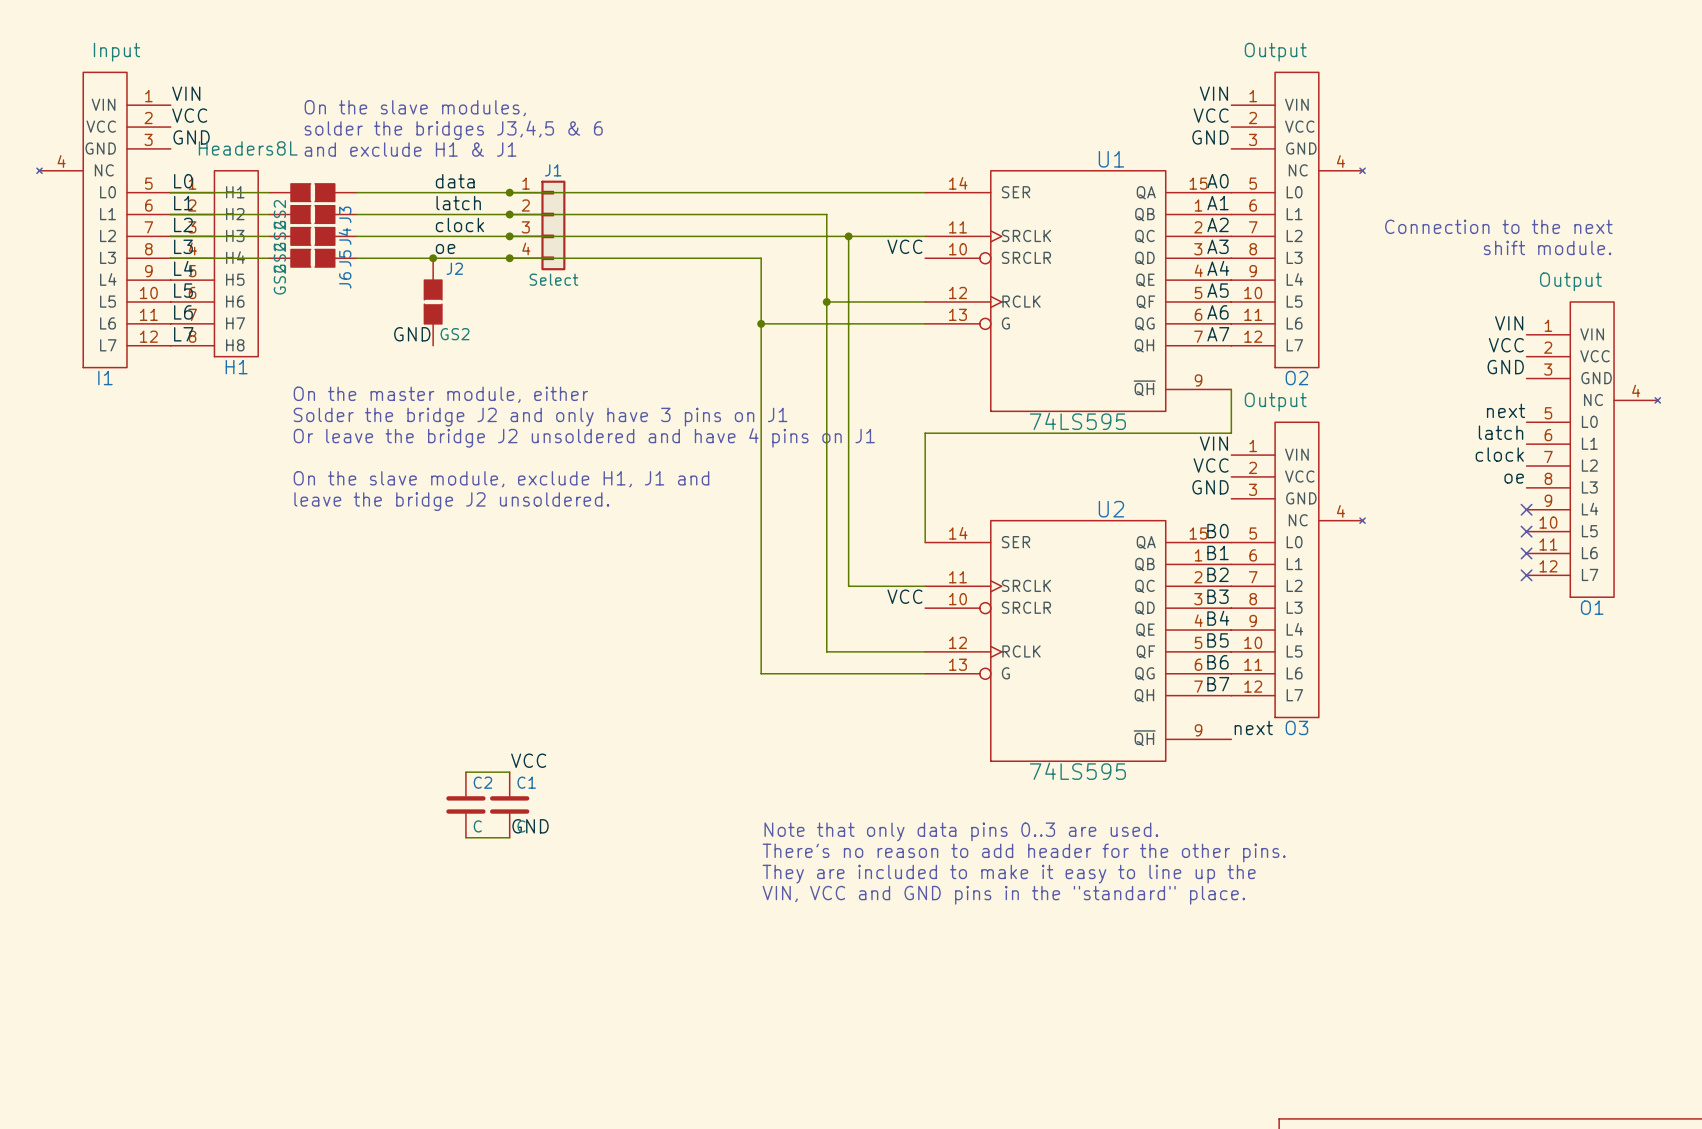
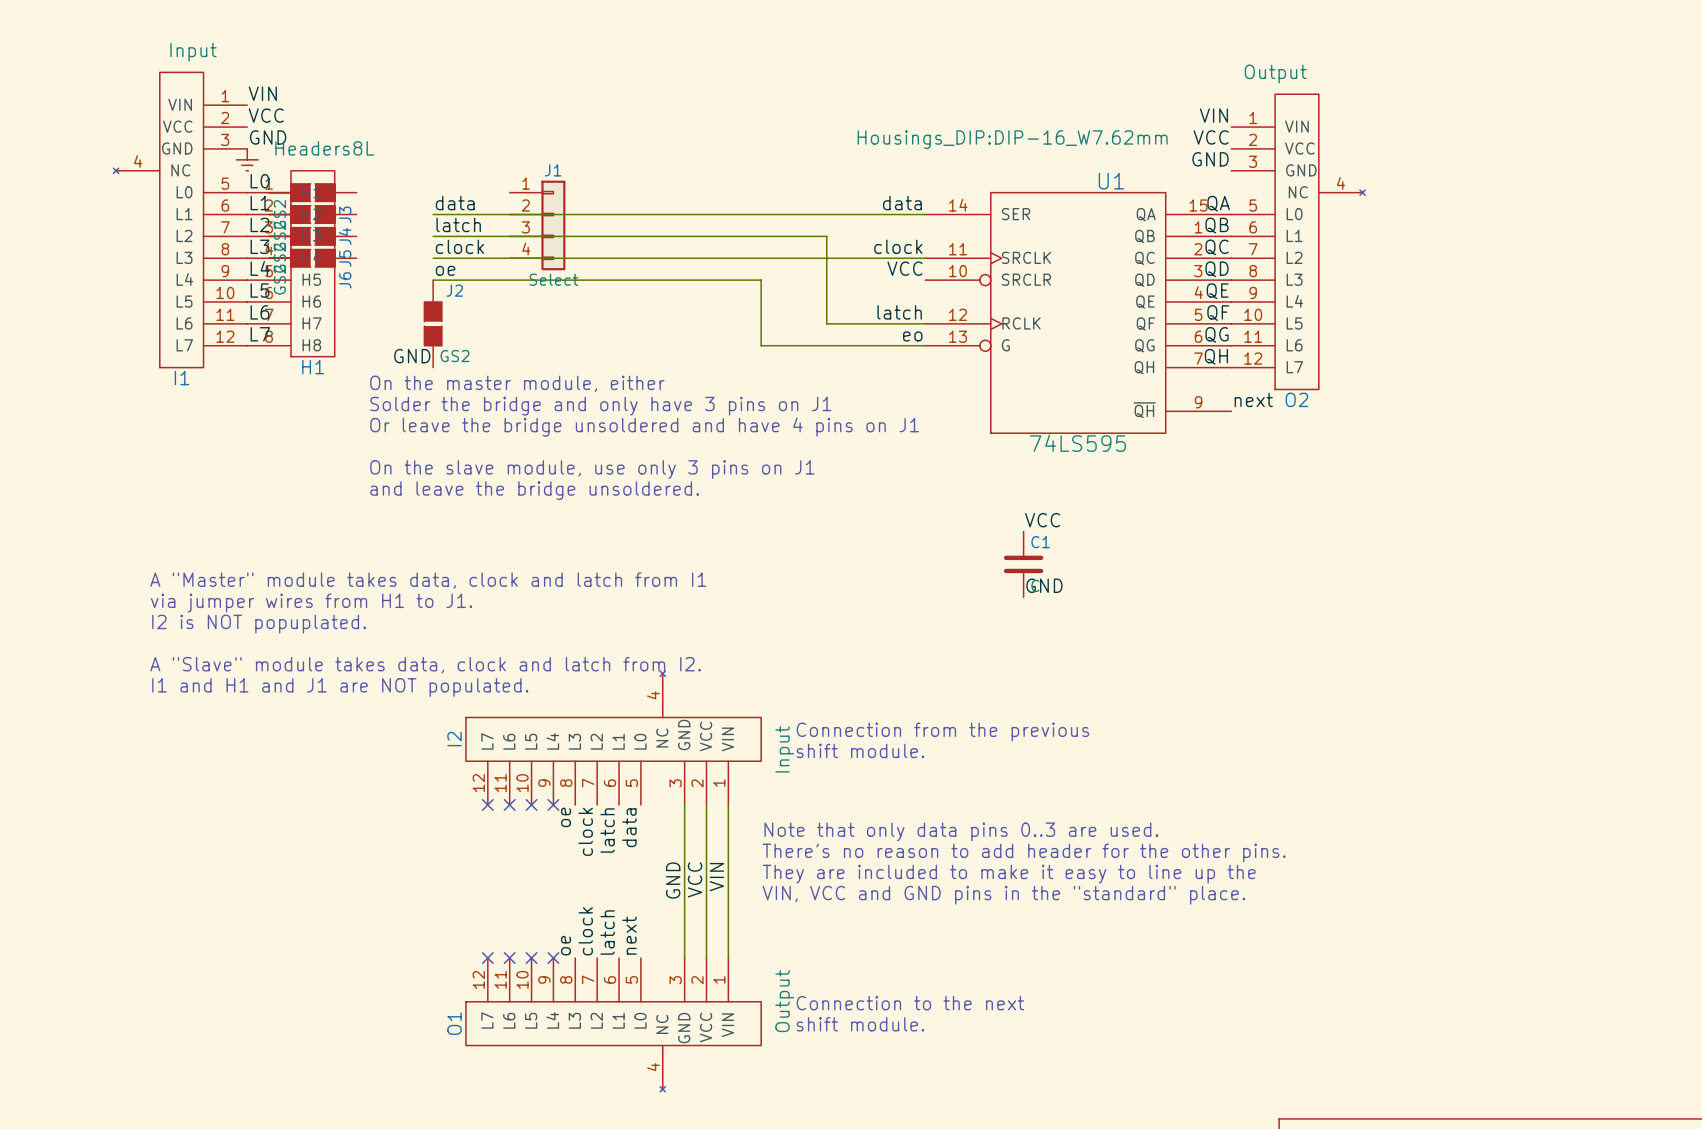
label position: VIN (186, 93) -> VIN (262, 93)
label: VIN (1213, 93) -> none
text: On the slave modules, (415, 108) -> none
label position: VCC (189, 115) -> VCC (266, 115)
label: VCC (1211, 115) -> VIN (1213, 115)
text: solder the bridges J3,4,5 & 6 (453, 130) -> none
label position: GND (191, 137) -> GND (268, 137)
label: GND (1210, 137) -> VCC (1211, 137)
U1 text: none -> Housings_DIP:DIP-16_W7.62mm (1012, 139)
text: and exclude H1 & J1 (410, 149) -> none
power symbol: none -> (247, 159)
label: none -> GND (1210, 159)
label position: L0 (183, 181) -> L0 (259, 181)
label: data (455, 181) -> none
label: A0 (1217, 181) -> none
wire: (356, 192) (925, 192) -> none
junction: (509, 192) -> none
label position: L1 (183, 203) -> L1 (259, 203)
label: latch (458, 203) -> data (455, 203)
label: none -> data (902, 203)
label: A1 (1217, 203) -> QA (1218, 203)
wire: (356, 214) (433, 214) -> none
junction: (509, 214) -> none
wire: (826, 214) (826, 236) (925, 236) -> (826, 214) (925, 214)
I1 position: (103, 219) -> (180, 219)
O2 position: (1298, 219) -> (1298, 241)
label position: L2 (183, 224) -> L2 (259, 224)
label: clock (459, 224) -> latch (458, 224)
label: A2 (1217, 224) -> QB (1217, 225)
text: Connection to the next (1498, 226) -> none
wire: (356, 236) (433, 236) -> none
junction: (509, 236) -> none
wire: (848, 236) (848, 586) (925, 586) -> none
junction: (848, 236) -> none
label position: L3 (183, 246) -> L3 (259, 246)
label: VCC (904, 246) -> clock (898, 246)
label: A3 (1217, 246) -> QC (1217, 247)
text: shift module. (1547, 247) -> none
label: oe (445, 248) -> clock (459, 246)
wire: (356, 258) (433, 258) -> none
junction: (433, 258) -> none
junction: (509, 258) -> none
wire: (761, 258) (761, 280) -> (761, 258) (925, 258)
H1 position: (214, 263) -> (290, 263)
label position: L4 (183, 268) -> L4 (260, 268)
label: none -> VCC (904, 268)
label: A4 (1218, 268) -> QD (1217, 269)
label: none -> oe (445, 270)
wire: none -> (433, 280) (761, 280)
label position: L5 (183, 290) -> L5 (259, 290)
label: A5 (1217, 290) -> QE (1217, 291)
U1 position: (1078, 291) -> (1078, 312)
J2 position: (433, 301) -> (433, 323)
wire: (826, 301) (925, 301) -> none
junction: (826, 301) -> none
label position: L6 (183, 312) -> L6 (259, 312)
label: none -> latch (899, 312)
label: A6 (1217, 312) -> QF (1218, 313)
wire: (761, 323) (826, 323) (826, 651) (925, 651) -> none
junction: (761, 323) -> none
label: VIN (1509, 323) -> none
label position: L7 (183, 334) -> L7 (260, 334)
label position: GND (412, 334) -> GND (412, 356)
label: A7 (1218, 334) -> QG (1217, 334)
label: none -> eo (912, 336)
wire: (761, 345) (761, 673) (925, 673) -> (761, 345) (925, 345)
label: VCC (1506, 345) -> none
label: none -> QH (1216, 356)
label: GND (1505, 367) -> none
wire: (1231, 389) (1231, 433) (925, 433) (925, 542) -> none
text position: On the master module, either (440, 394) -> On the master module, either (517, 383)
label: none -> next (1253, 399)
text: none -> Solder the bridge and only have 3 pins on J1 (600, 406)
label: next (1506, 410) -> none
text: Solder the bridge J2 and only have 3 pins on J1 (540, 417) -> none
text: none -> Or leave the bridge unsoldered and have 4 pins on J1 (644, 426)
label: latch (1501, 432) -> none
text: Or leave the bridge J2 unsoldered and have 4 pins on J1 (584, 437) -> none
label: VIN (1213, 443) -> none
O1 position: (1593, 449) -> (613, 1024)
O1 rotation: 0° (1615, 449) -> 90° clockwise (613, 1046)
label: clock (1499, 454) -> none
label: VCC (1211, 465) -> none
label: oe (1514, 478) -> none
text: On the slave module, exclude H1, J1 and (501, 479) -> On the slave module, use only 3 pins on J1 (592, 469)
label: GND (1210, 487) -> none
text: leave the bridge J2 unsoldered. (451, 501) -> and leave the bridge unsoldered. (534, 490)
no-connect mark: (1526, 509) -> none
label: none -> VCC (1042, 520)
label: B0 (1217, 531) -> none
no-connect mark: (1526, 531) -> none
label: B1 (1217, 552) -> none
no-connect mark: (1526, 553) -> none
O3: Output (1298, 569) -> none
label: B2 (1217, 574) -> none
no-connect mark: (1526, 575) -> none
text: none -> A "Master" module takes data, clock and latch from I1 (428, 580)
label: none -> GND (1044, 585)
label: VCC (904, 596) -> none
label: B3 (1217, 596) -> none
text: none -> via jumper wires from H1 to J1. (311, 602)
label: B4 (1218, 618) -> none
text: none -> I2 is NOT popuplated. (259, 624)
U2: 74LS595 (1078, 640) -> none
label: B5 (1217, 640) -> none
label: B6 (1217, 662) -> none
text: none -> A "Slave" module takes data, clock and latch from I2. (425, 665)
label: B7 (1218, 684) -> none
text: none -> I1 and H1 and J1 are NOT populated. (340, 687)
label: next (1253, 727) -> none
text: none -> Connection from the previous (942, 731)
I2: none -> Input (613, 738)
text: none -> shift module. (860, 750)
label: VCC (528, 760) -> none
wire: (465, 772) (509, 772) -> none
C2: C (465, 804) -> none
no-connect mark: none -> (487, 804)
C1 position: (509, 804) -> (1023, 564)
no-connect mark: none -> (509, 804)
no-connect mark: none -> (531, 804)
no-connect mark: none -> (553, 804)
wire: none -> (684, 804) (684, 958)
wire: none -> (706, 804) (706, 958)
wire: none -> (728, 804) (728, 958)
label: none -> oe (566, 817)
label rotation: 0° (530, 826) -> 90° counterclockwise (673, 880)
label position: GND (530, 826) -> GND (673, 880)
label: none -> data (629, 827)
label: none -> latch (607, 830)
label: none -> clock (585, 831)
wire: (465, 837) (509, 837) -> none
label: none -> VIN (716, 877)
label: none -> VCC (695, 879)
label: none -> clock (585, 931)
label: none -> latch (607, 932)
label: none -> next (629, 935)
label: none -> oe (566, 945)
no-connect mark: none -> (487, 958)
no-connect mark: none -> (509, 958)
no-connect mark: none -> (531, 958)
no-connect mark: none -> (553, 958)
text: none -> Connection to the next (910, 1003)
text: none -> shift module. (860, 1024)

